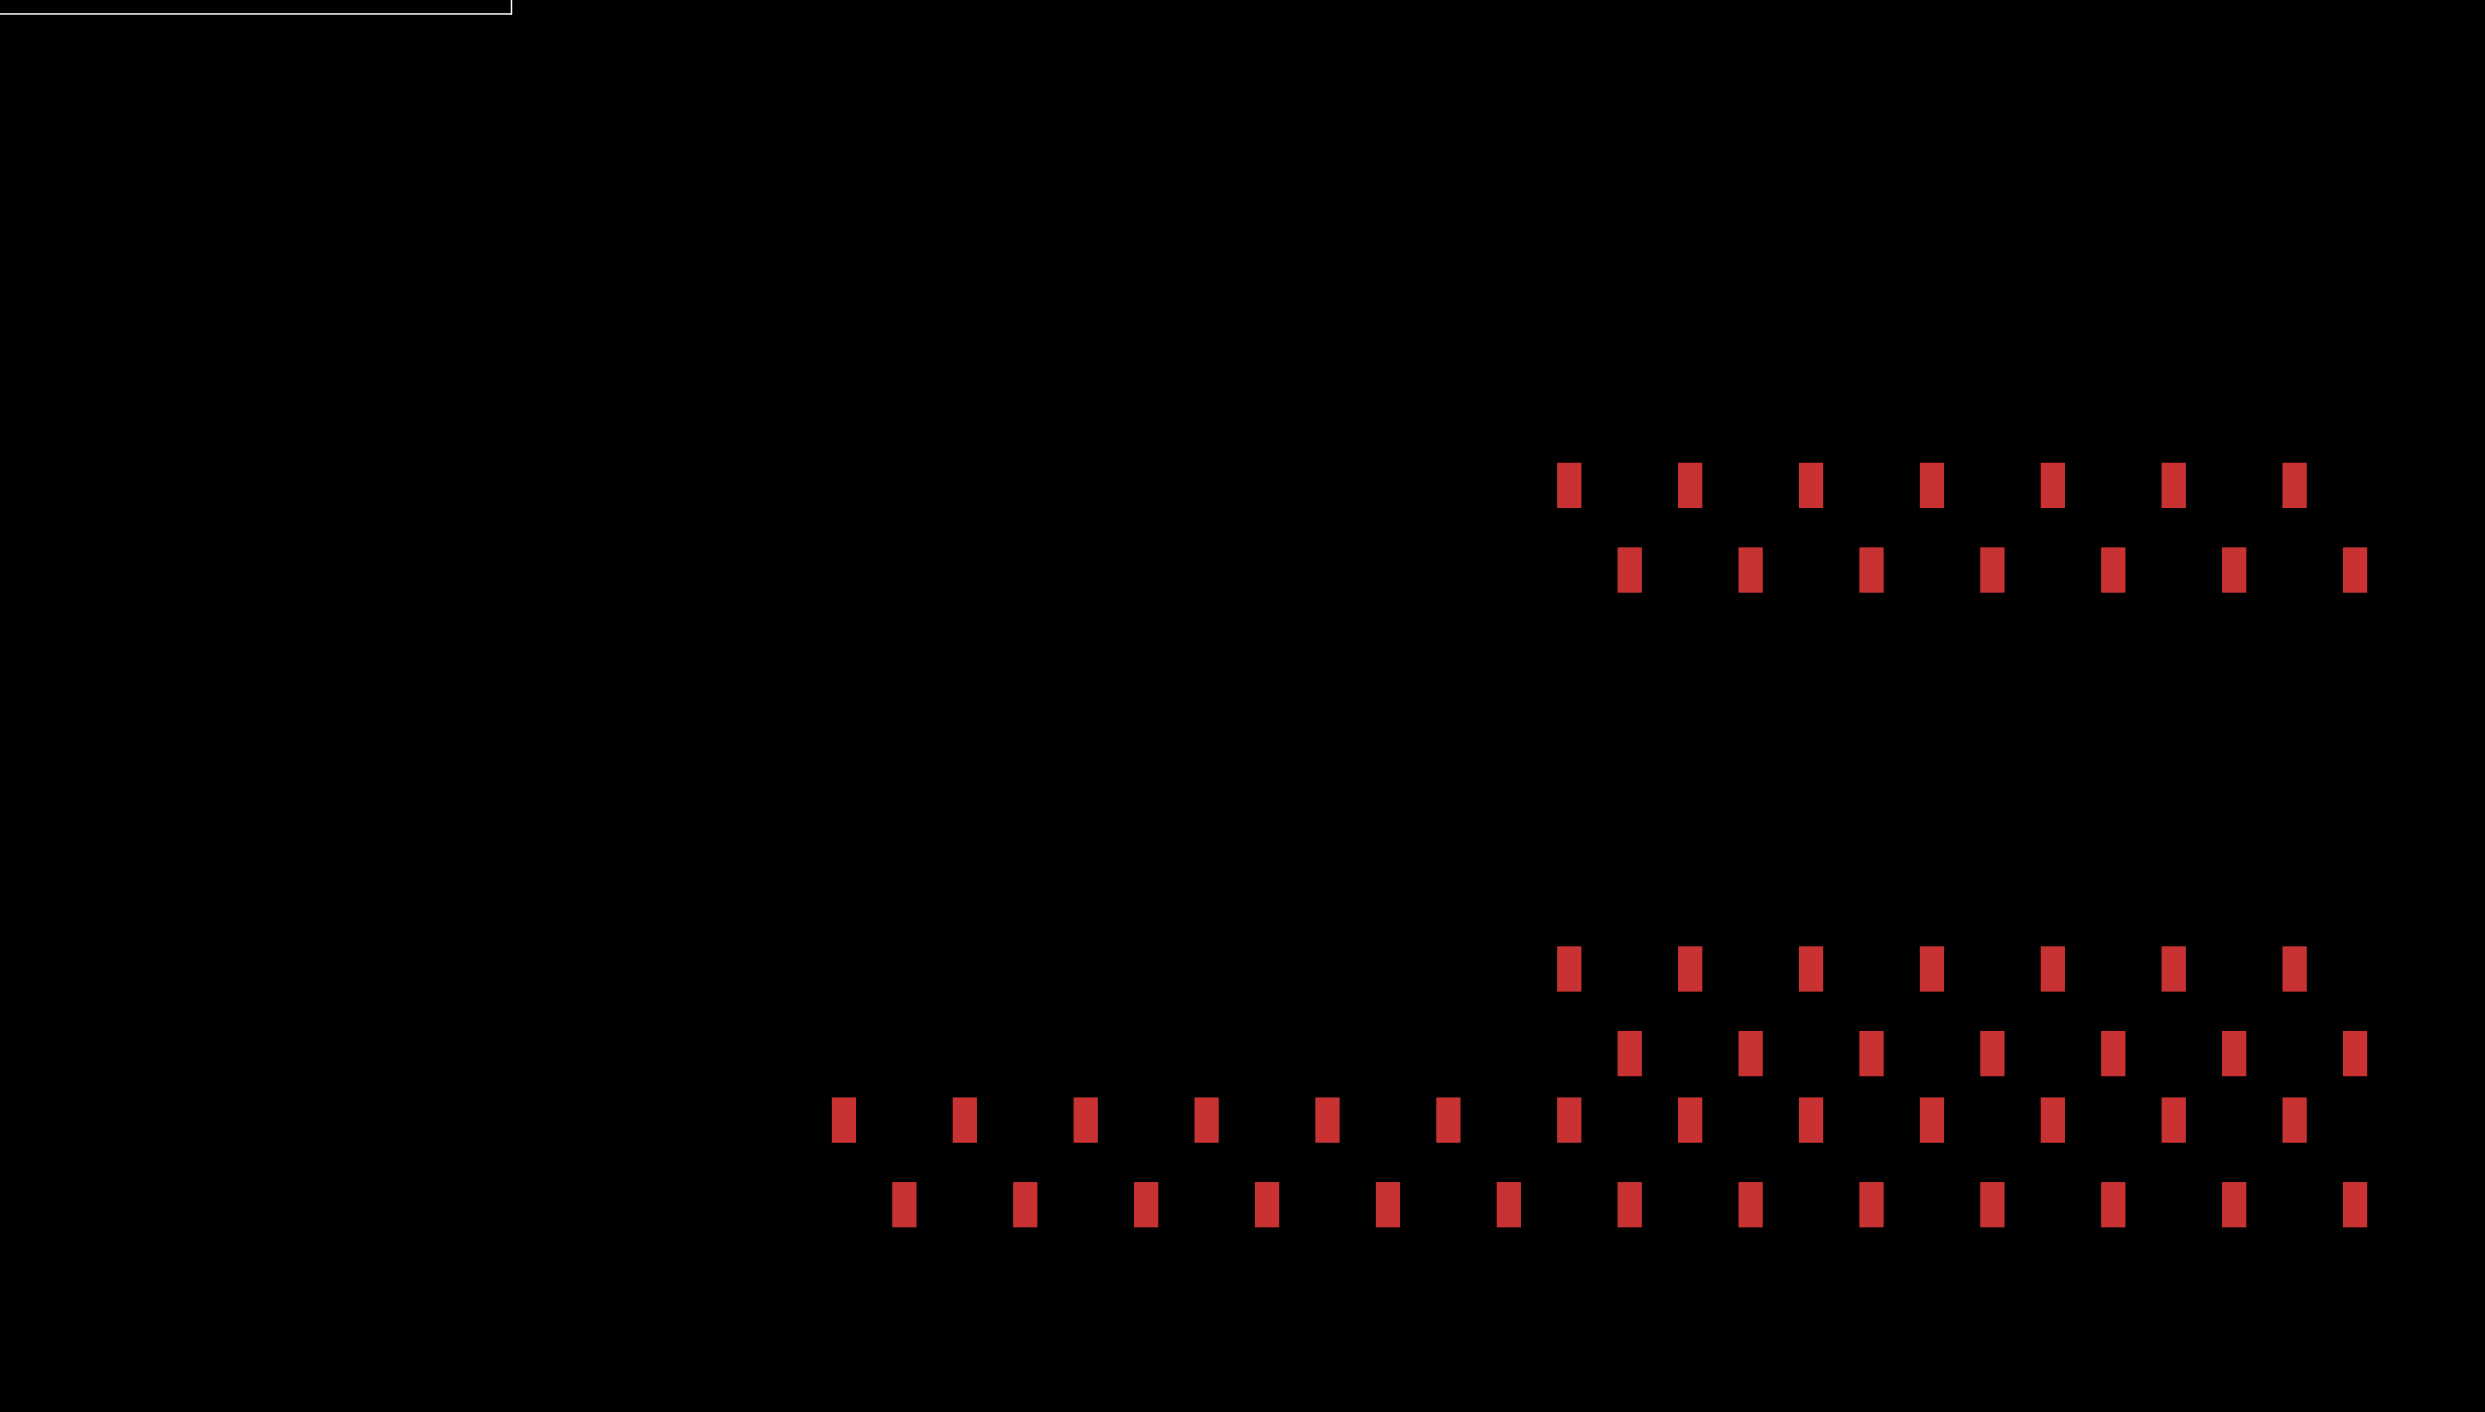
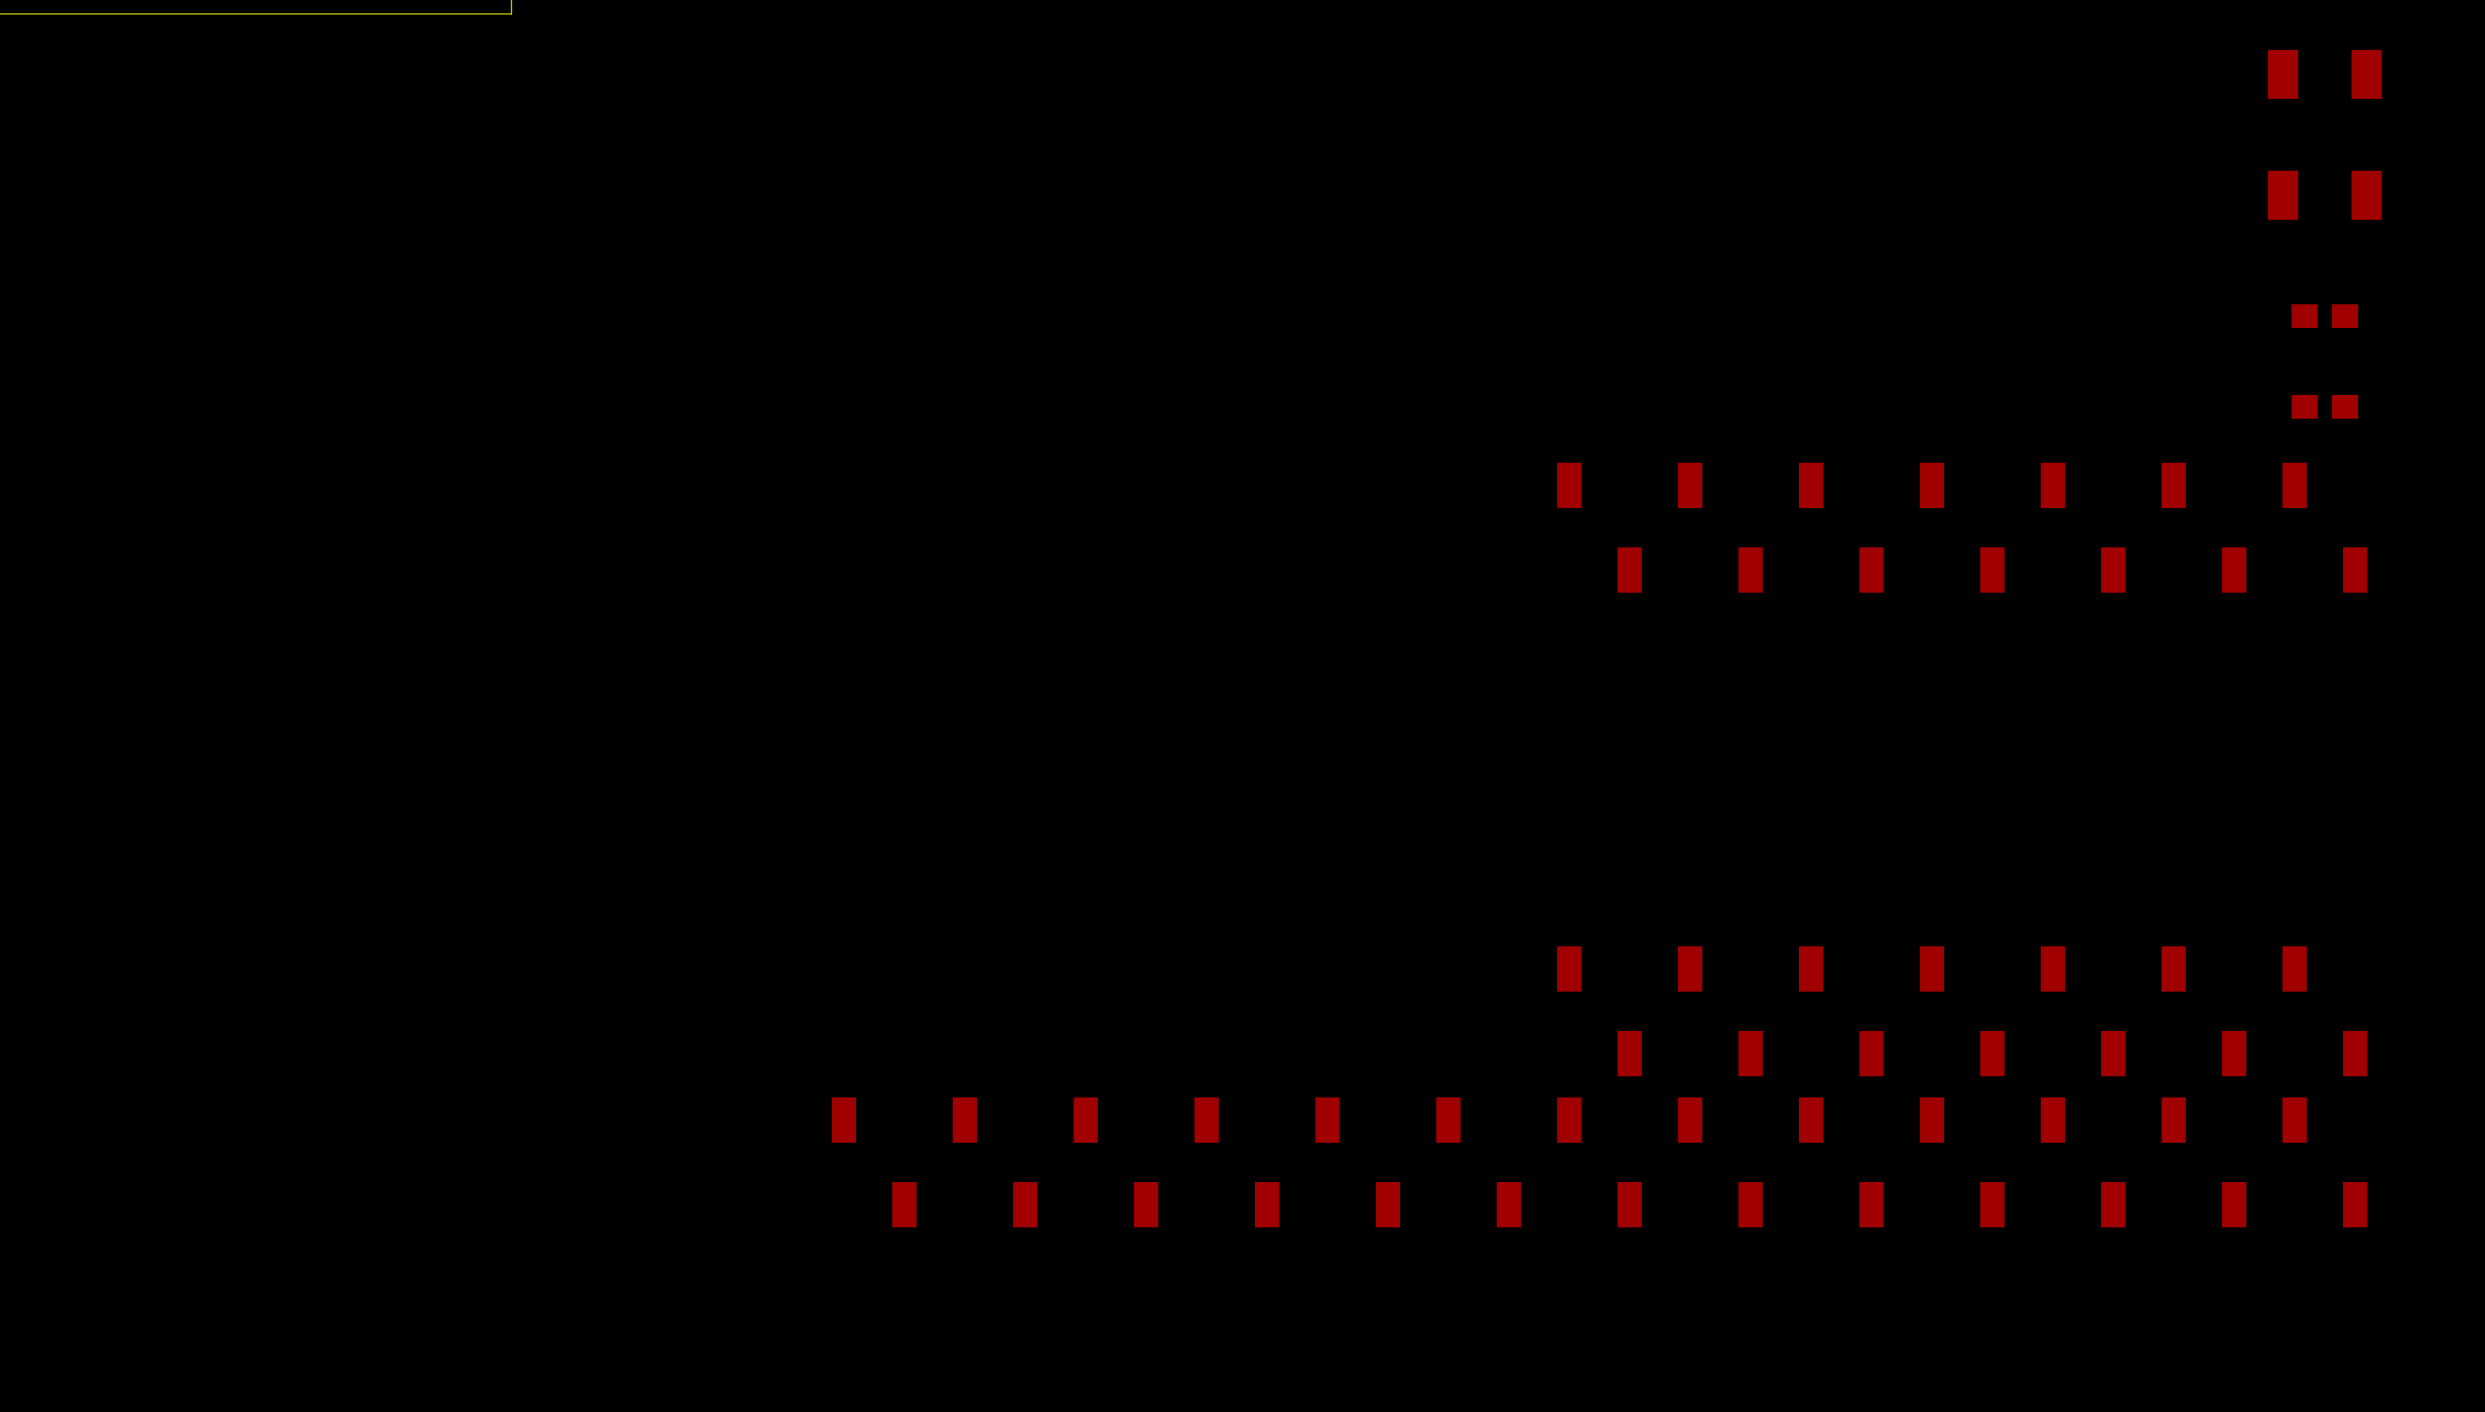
part: none -> (2324, 74)
part: none -> (2324, 195)
part: none -> (2324, 316)
part: none -> (2324, 406)

